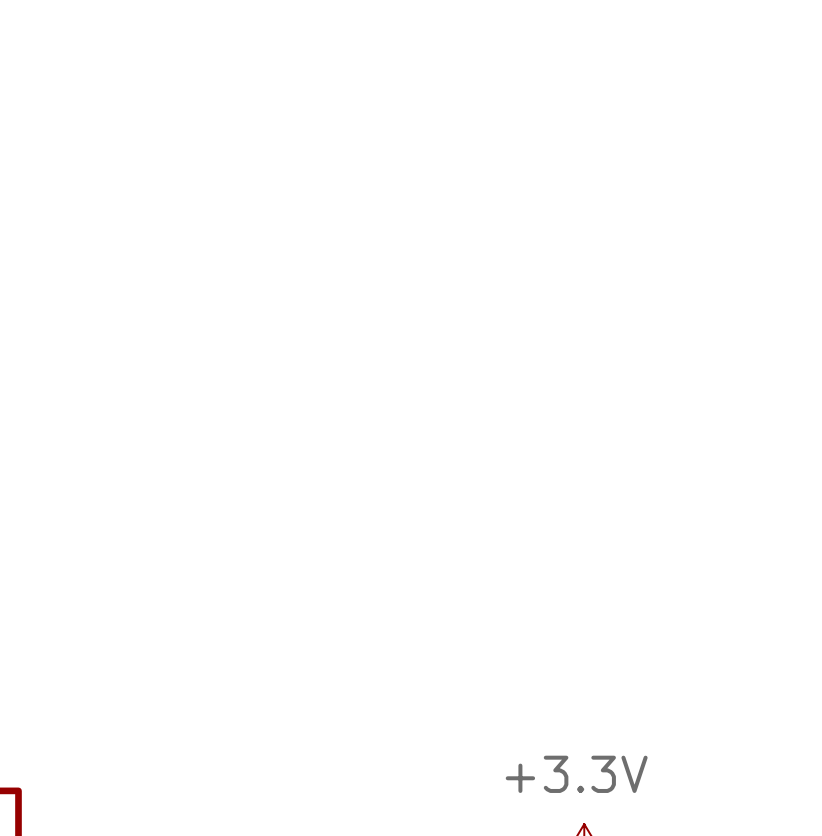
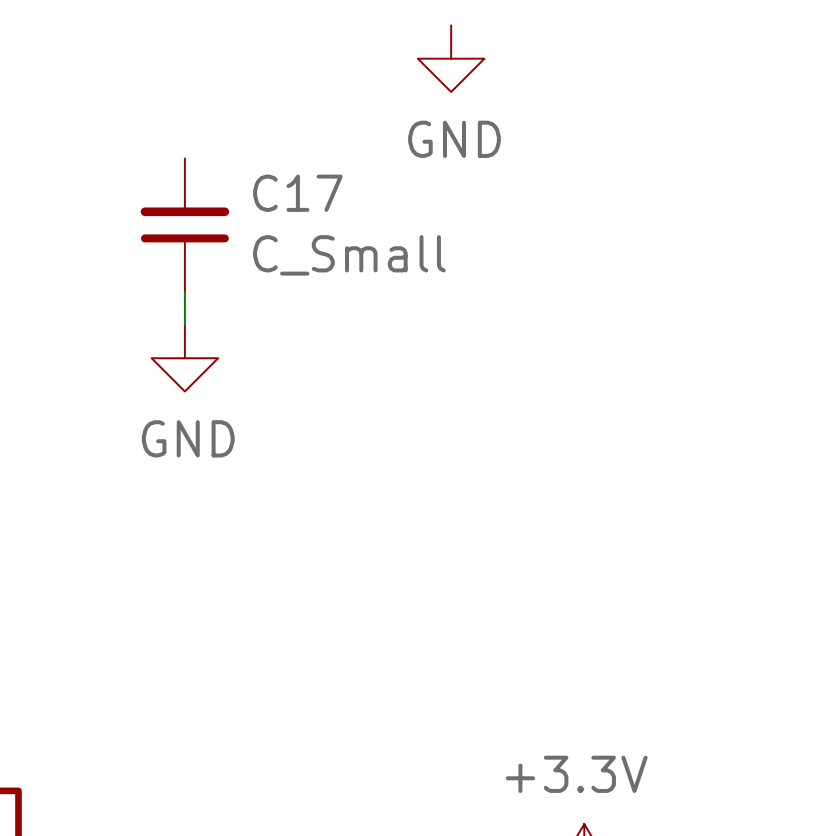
power symbol: none -> GND (451, 58)
C17: none -> C_Small (184, 225)
wire: none -> (184, 291) (184, 324)
power symbol: none -> GND (184, 358)

